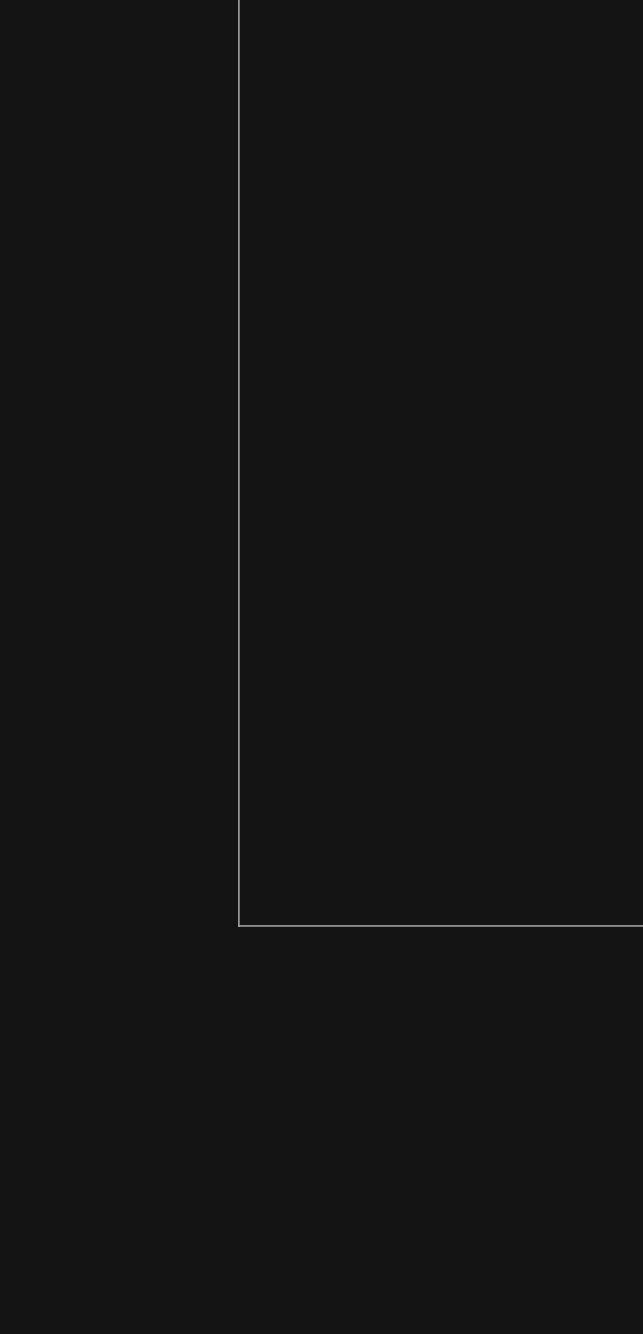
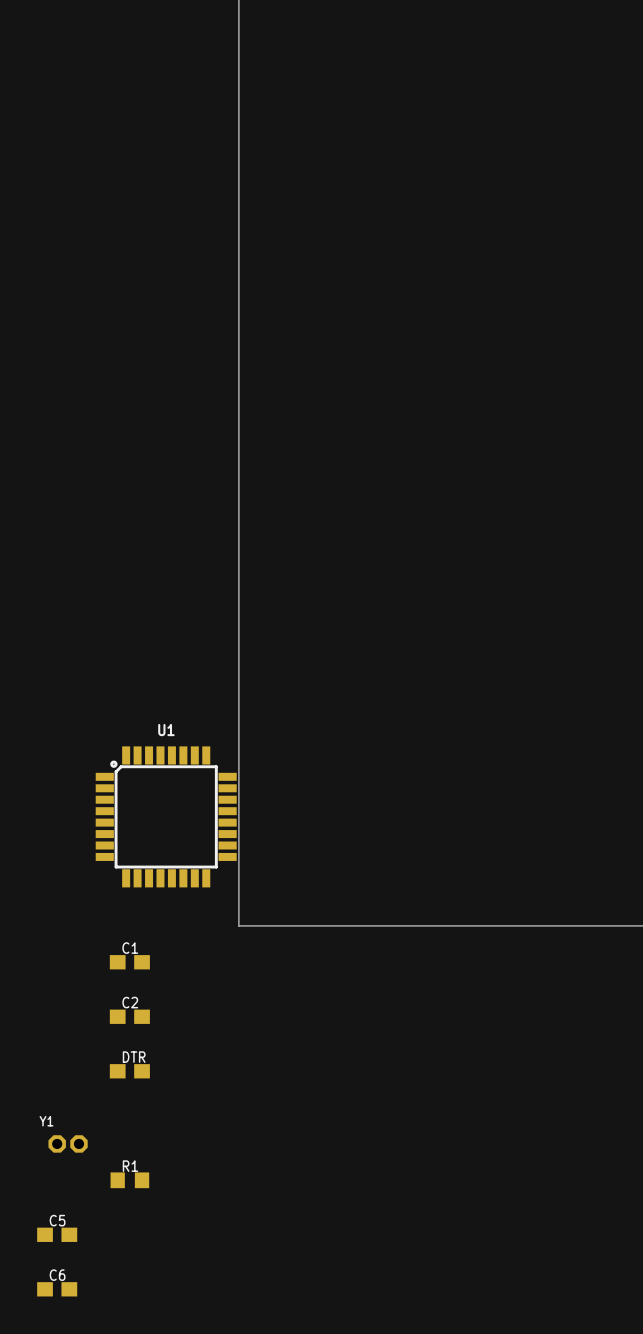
U1: none -> (166, 816)
C1: none -> (129, 962)
C2: none -> (129, 1016)
DTR: none -> (129, 1071)
Y1: none -> (68, 1143)
R1: none -> (129, 1180)
C5: none -> (57, 1234)
C6: none -> (57, 1289)

